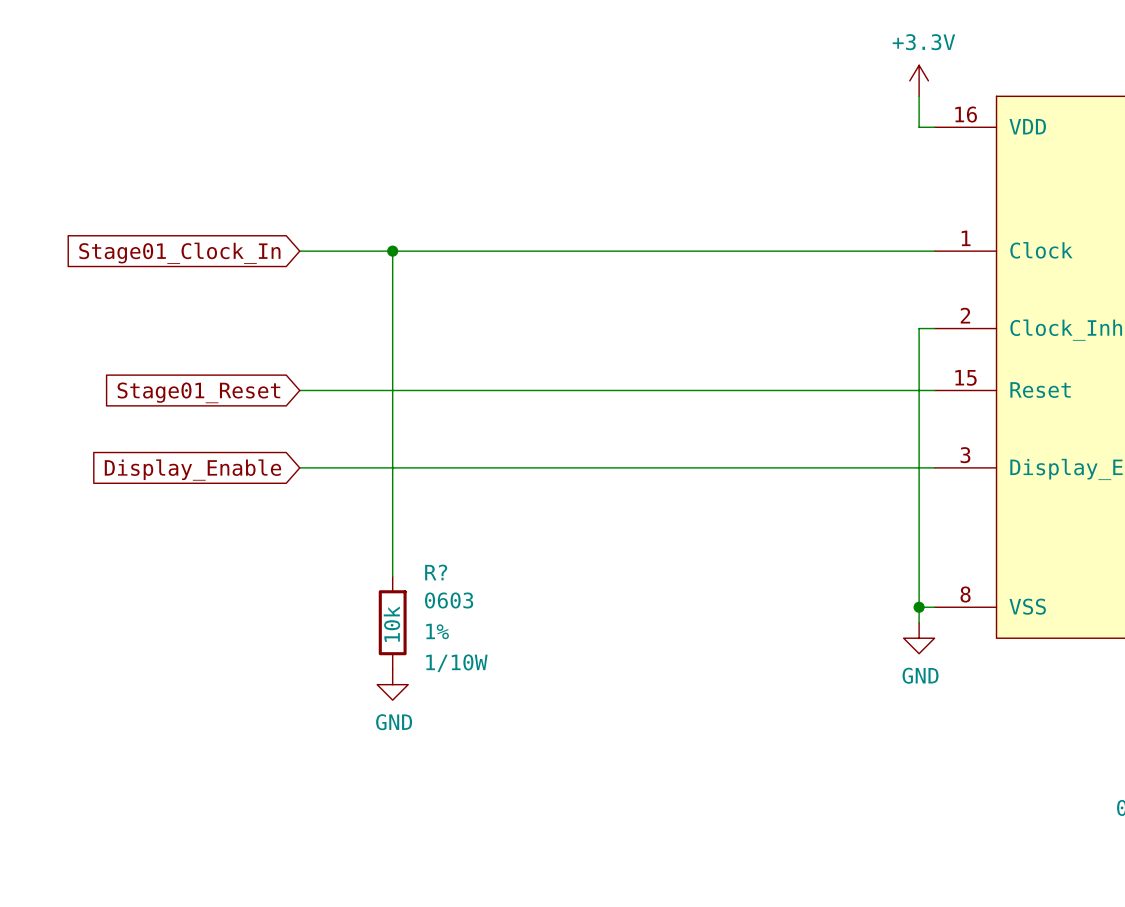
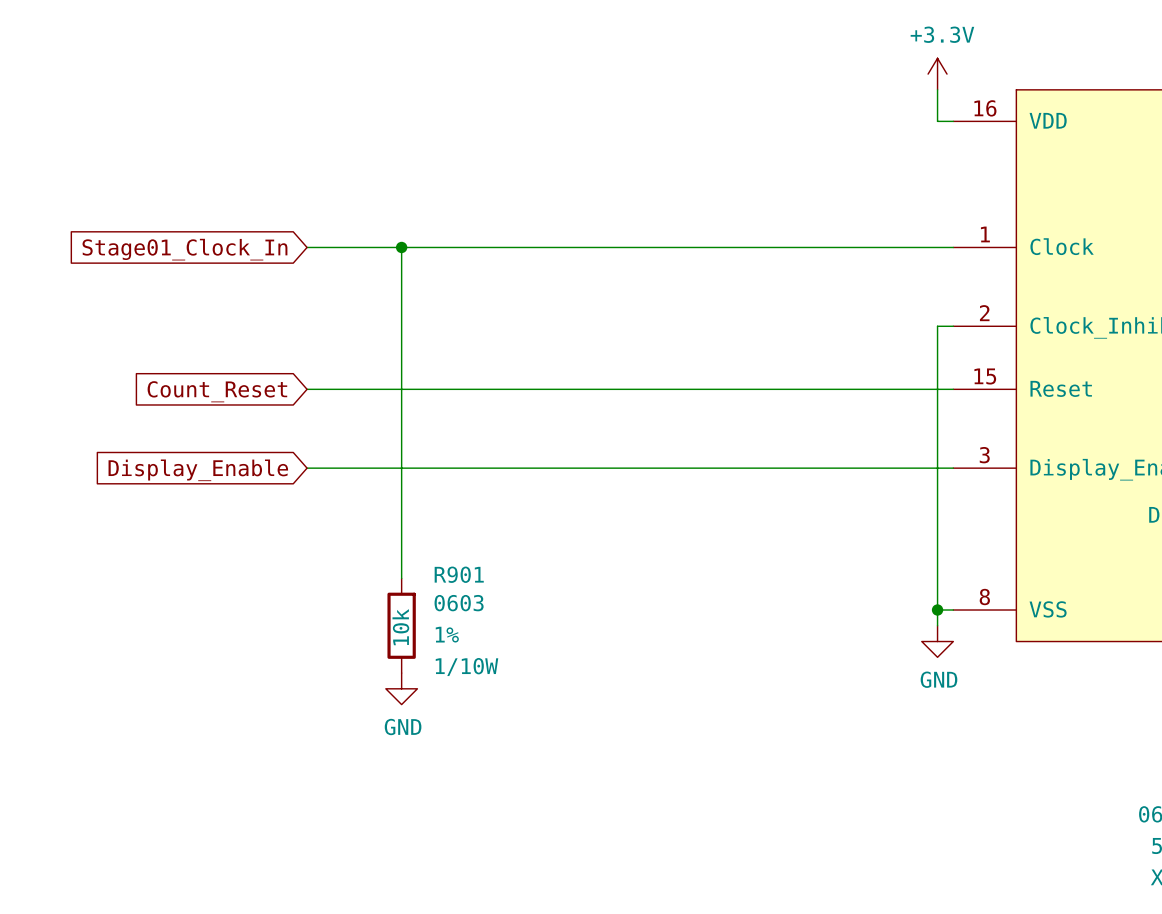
global label: Stage01_Reset (198, 392) -> Count_Reset (217, 391)
R? name: R? (436, 572) -> R901 (459, 574)

